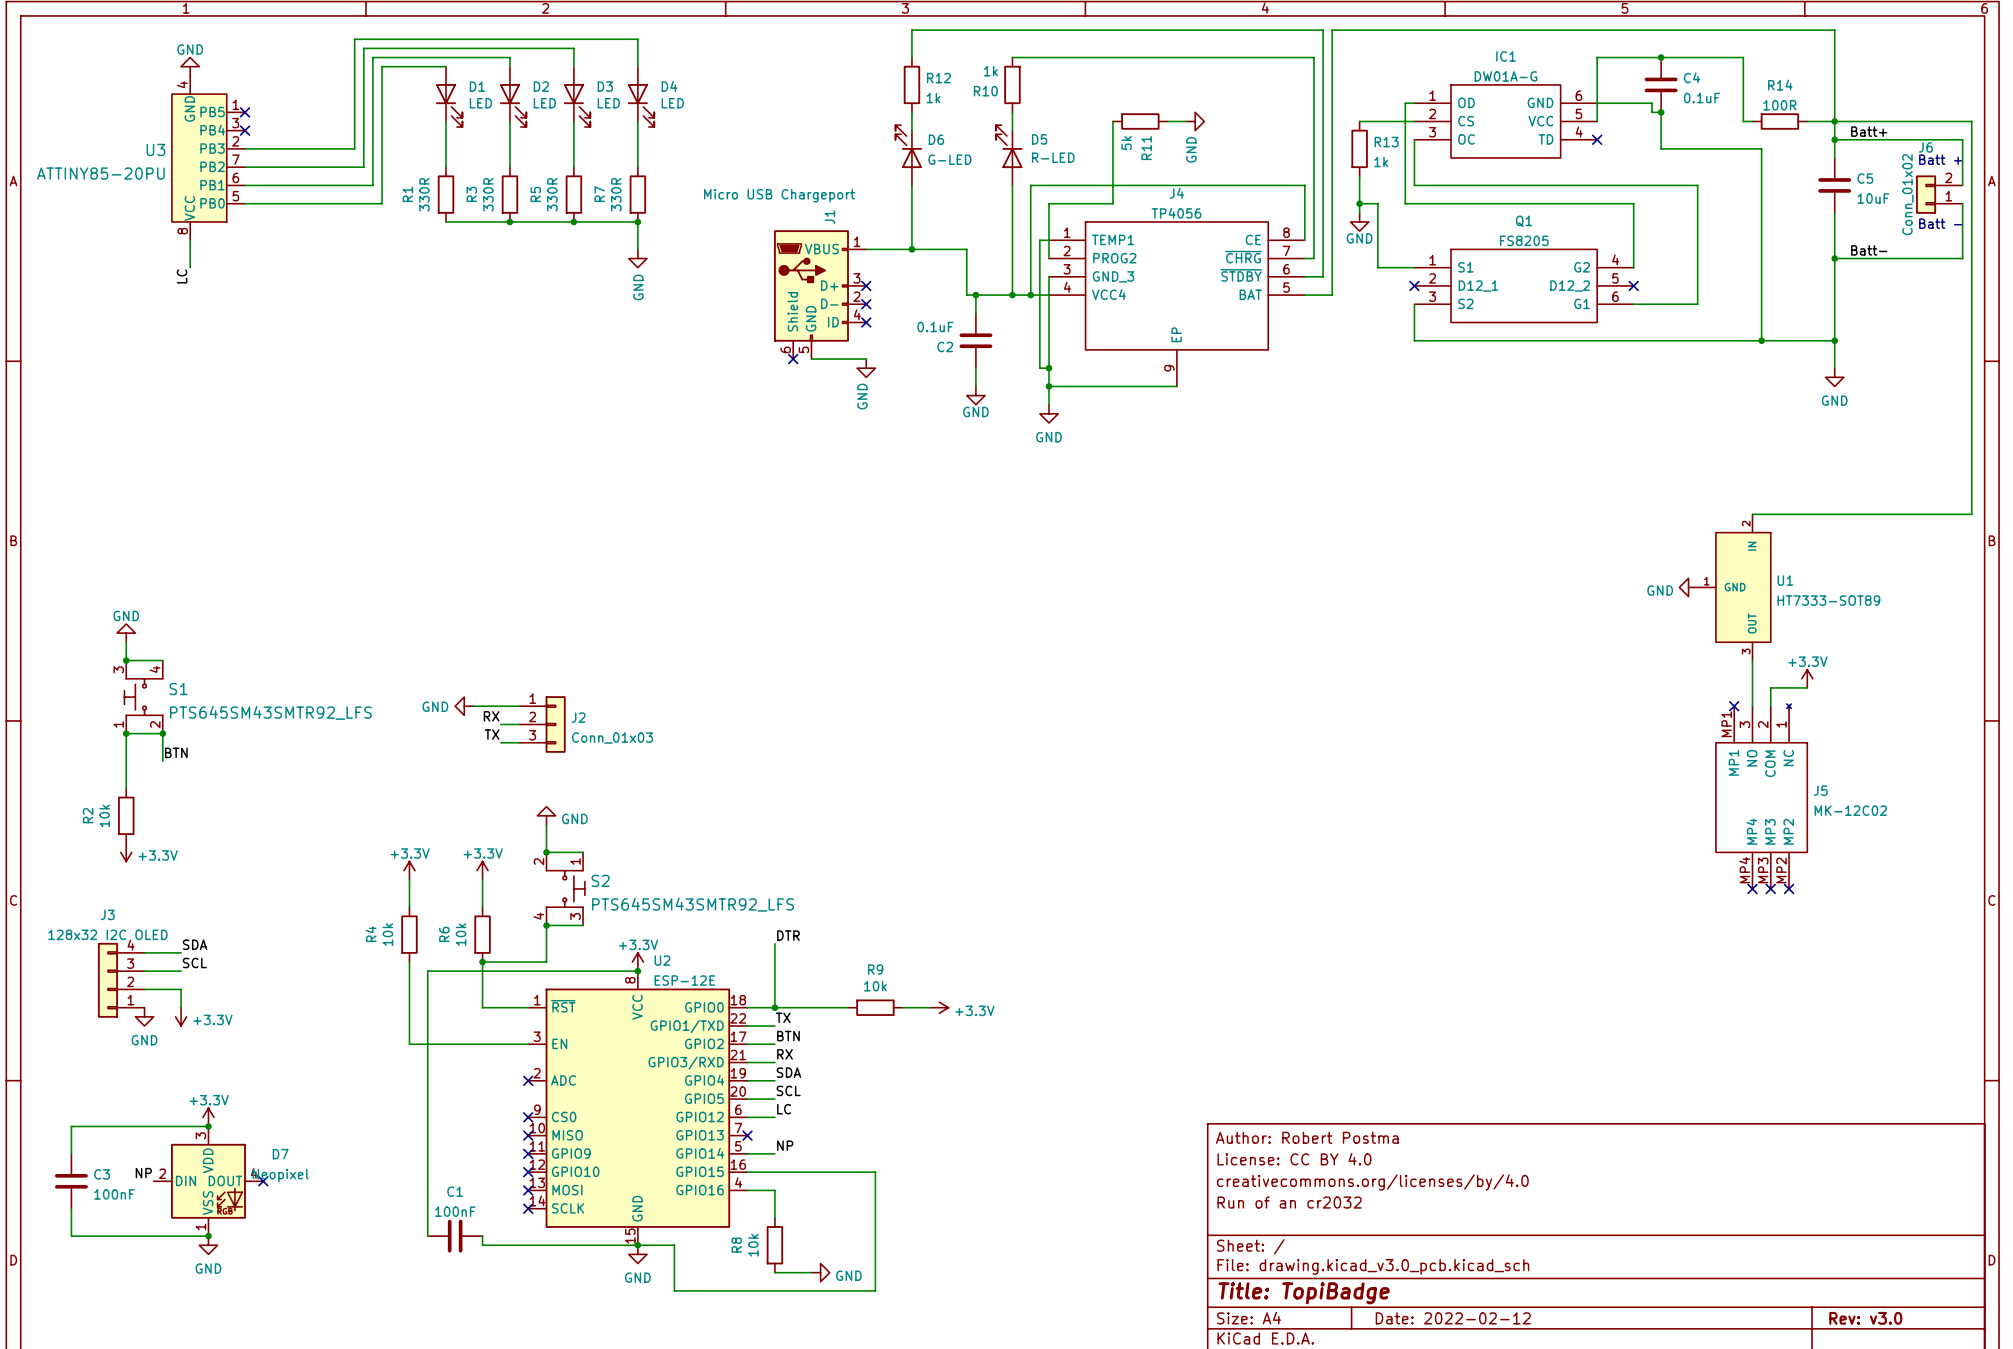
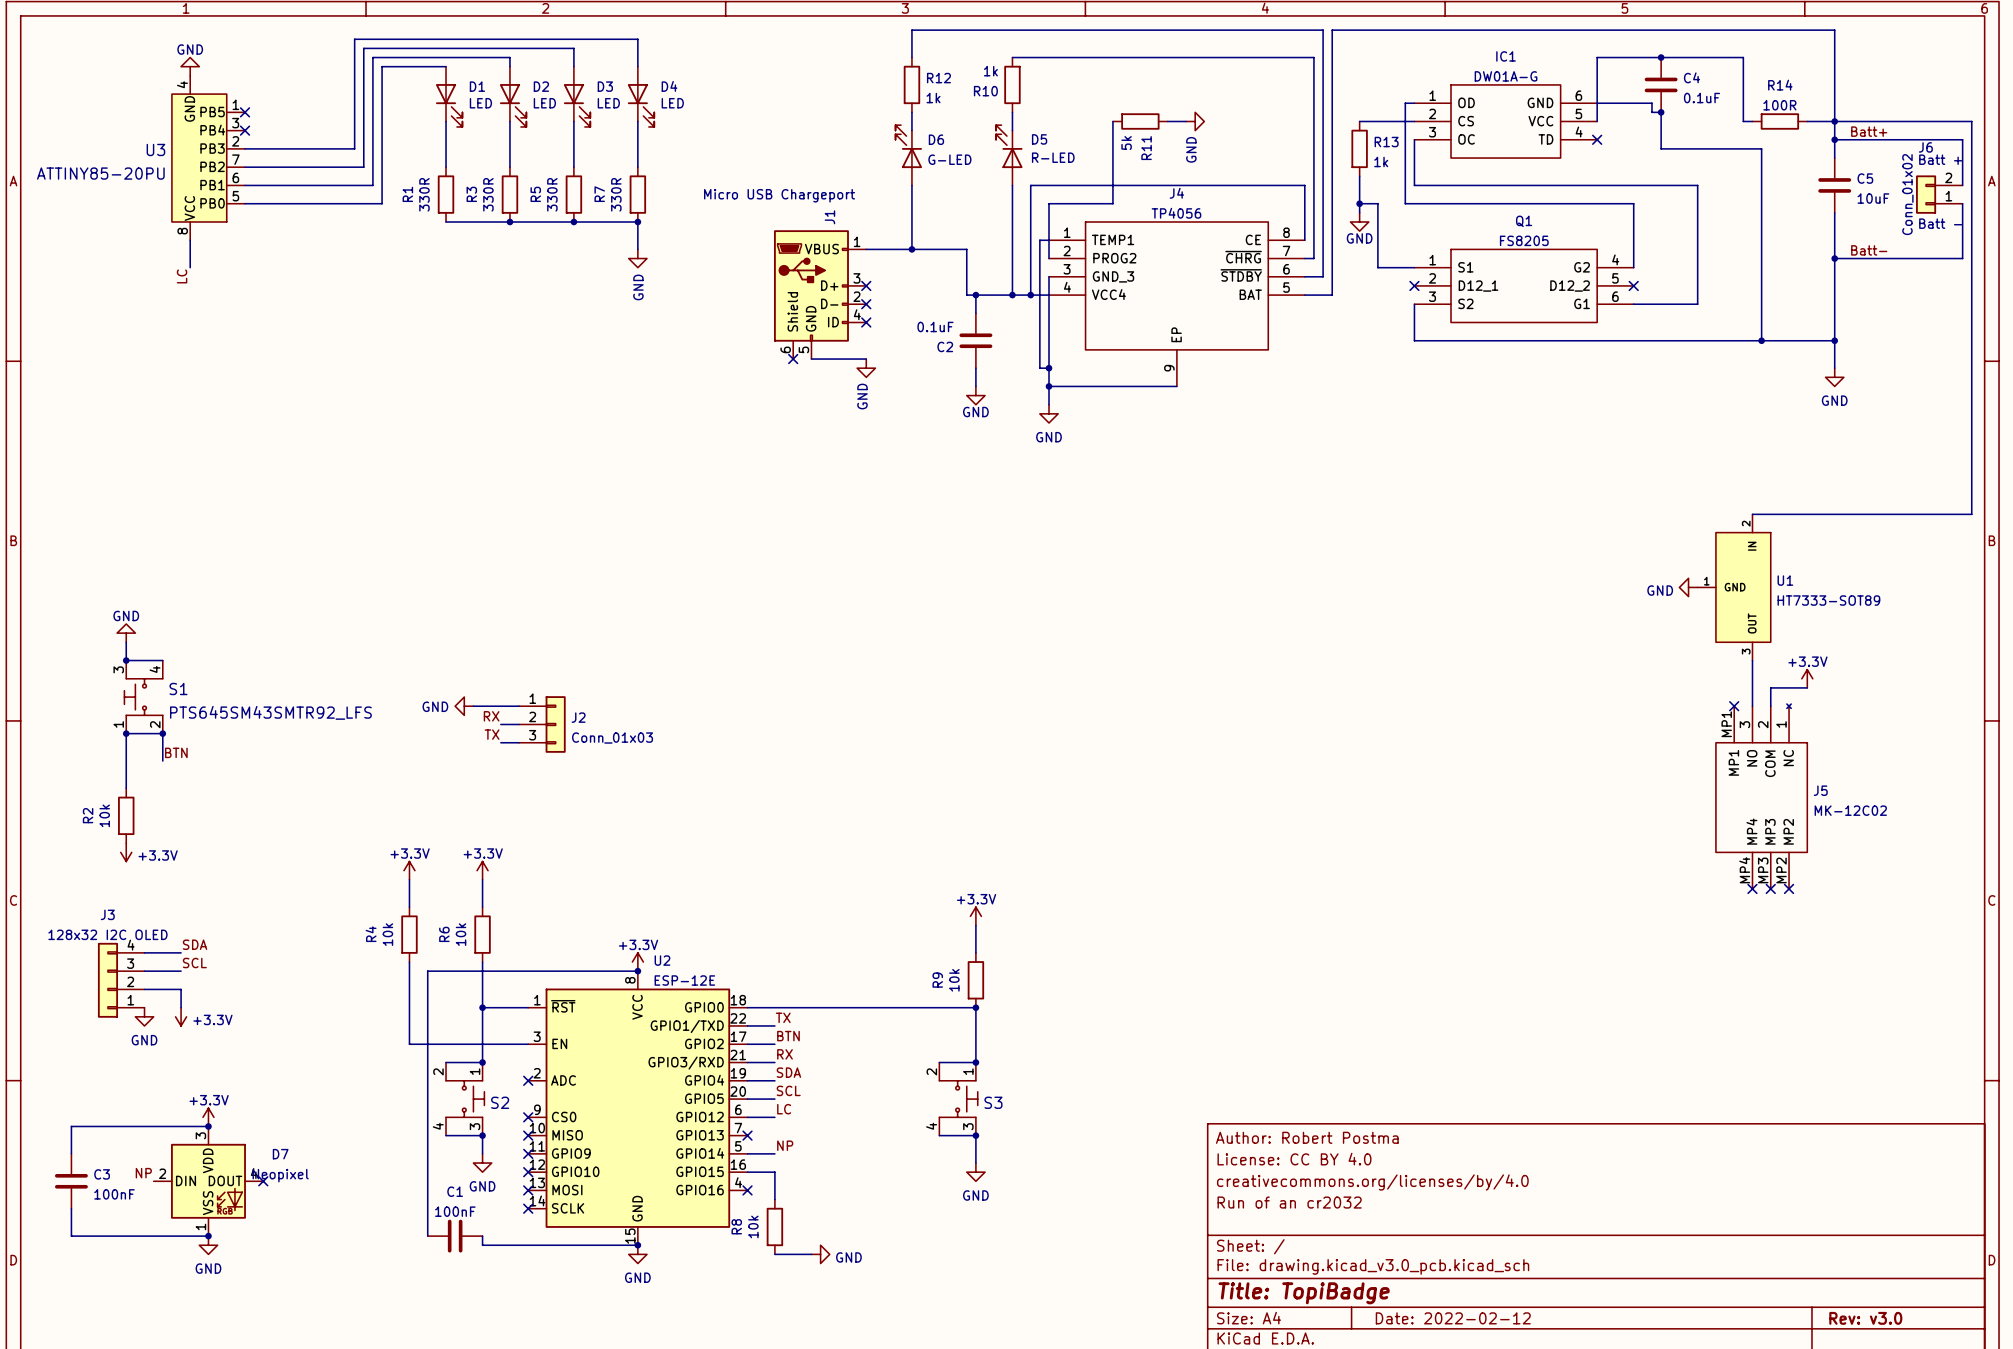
power symbol: GND (546, 815) -> none
wire: (546, 824) (546, 852) (583, 852) -> none
junction: (546, 852) -> none
S2 name position: S2 (600, 880) -> S2 (500, 1102)
S2 position: (565, 888) -> (465, 1099)
S2 value: PTS645SM43SMTR92_LFS (693, 904) -> none
junction: (546, 925) -> none
wire: (583, 925) (546, 925) (546, 962) (482, 962) -> none
wire: none -> (975, 925) (975, 952)
label: DTR (788, 935) -> none
wire: (774, 943) (774, 1007) -> none
junction: (482, 962) -> none
R9 name position: R9 (875, 969) -> R9 (937, 980)
R9 value position: 10k (875, 986) -> 10k (954, 980)
wire: none -> (482, 1007) (482, 1062) (446, 1062)
junction: none -> (482, 1007)
junction: (774, 1007) -> none
wire: none -> (848, 1007) (902, 1007)
R9 rotation: 0° (875, 1007) -> 90° clockwise (975, 980)
R9 position: (875, 1007) -> (975, 980)
wire: none -> (930, 1007) (975, 1007) (975, 1062) (939, 1062)
power symbol rotation: 0° (939, 1007) -> 90° counterclockwise (975, 916)
power symbol position: +3.3V (939, 1007) -> +3.3V (975, 916)
junction: none -> (975, 1007)
power symbol text position: +3.3V (974, 1010) -> +3.3V (976, 899)
junction: none -> (482, 1062)
junction: none -> (975, 1062)
S3: none -> (958, 1099)
wire: none -> (446, 1135) (482, 1135) (482, 1153)
junction: none -> (482, 1135)
wire: none -> (939, 1135) (975, 1135) (975, 1163)
junction: none -> (975, 1135)
power symbol: none -> GND (482, 1163)
wire: (774, 1172) (875, 1172) (875, 1290) (674, 1290) (674, 1245) (637, 1245) -> none
power symbol: none -> GND (975, 1172)
wire: (747, 1190) (774, 1190) -> (774, 1172) (774, 1190)
no-connect mark: none -> (747, 1190)
R8 position: (774, 1245) -> (774, 1226)
wire: (774, 1272) (811, 1272) -> (774, 1254) (811, 1254)
power symbol position: GND (820, 1272) -> GND (820, 1254)

